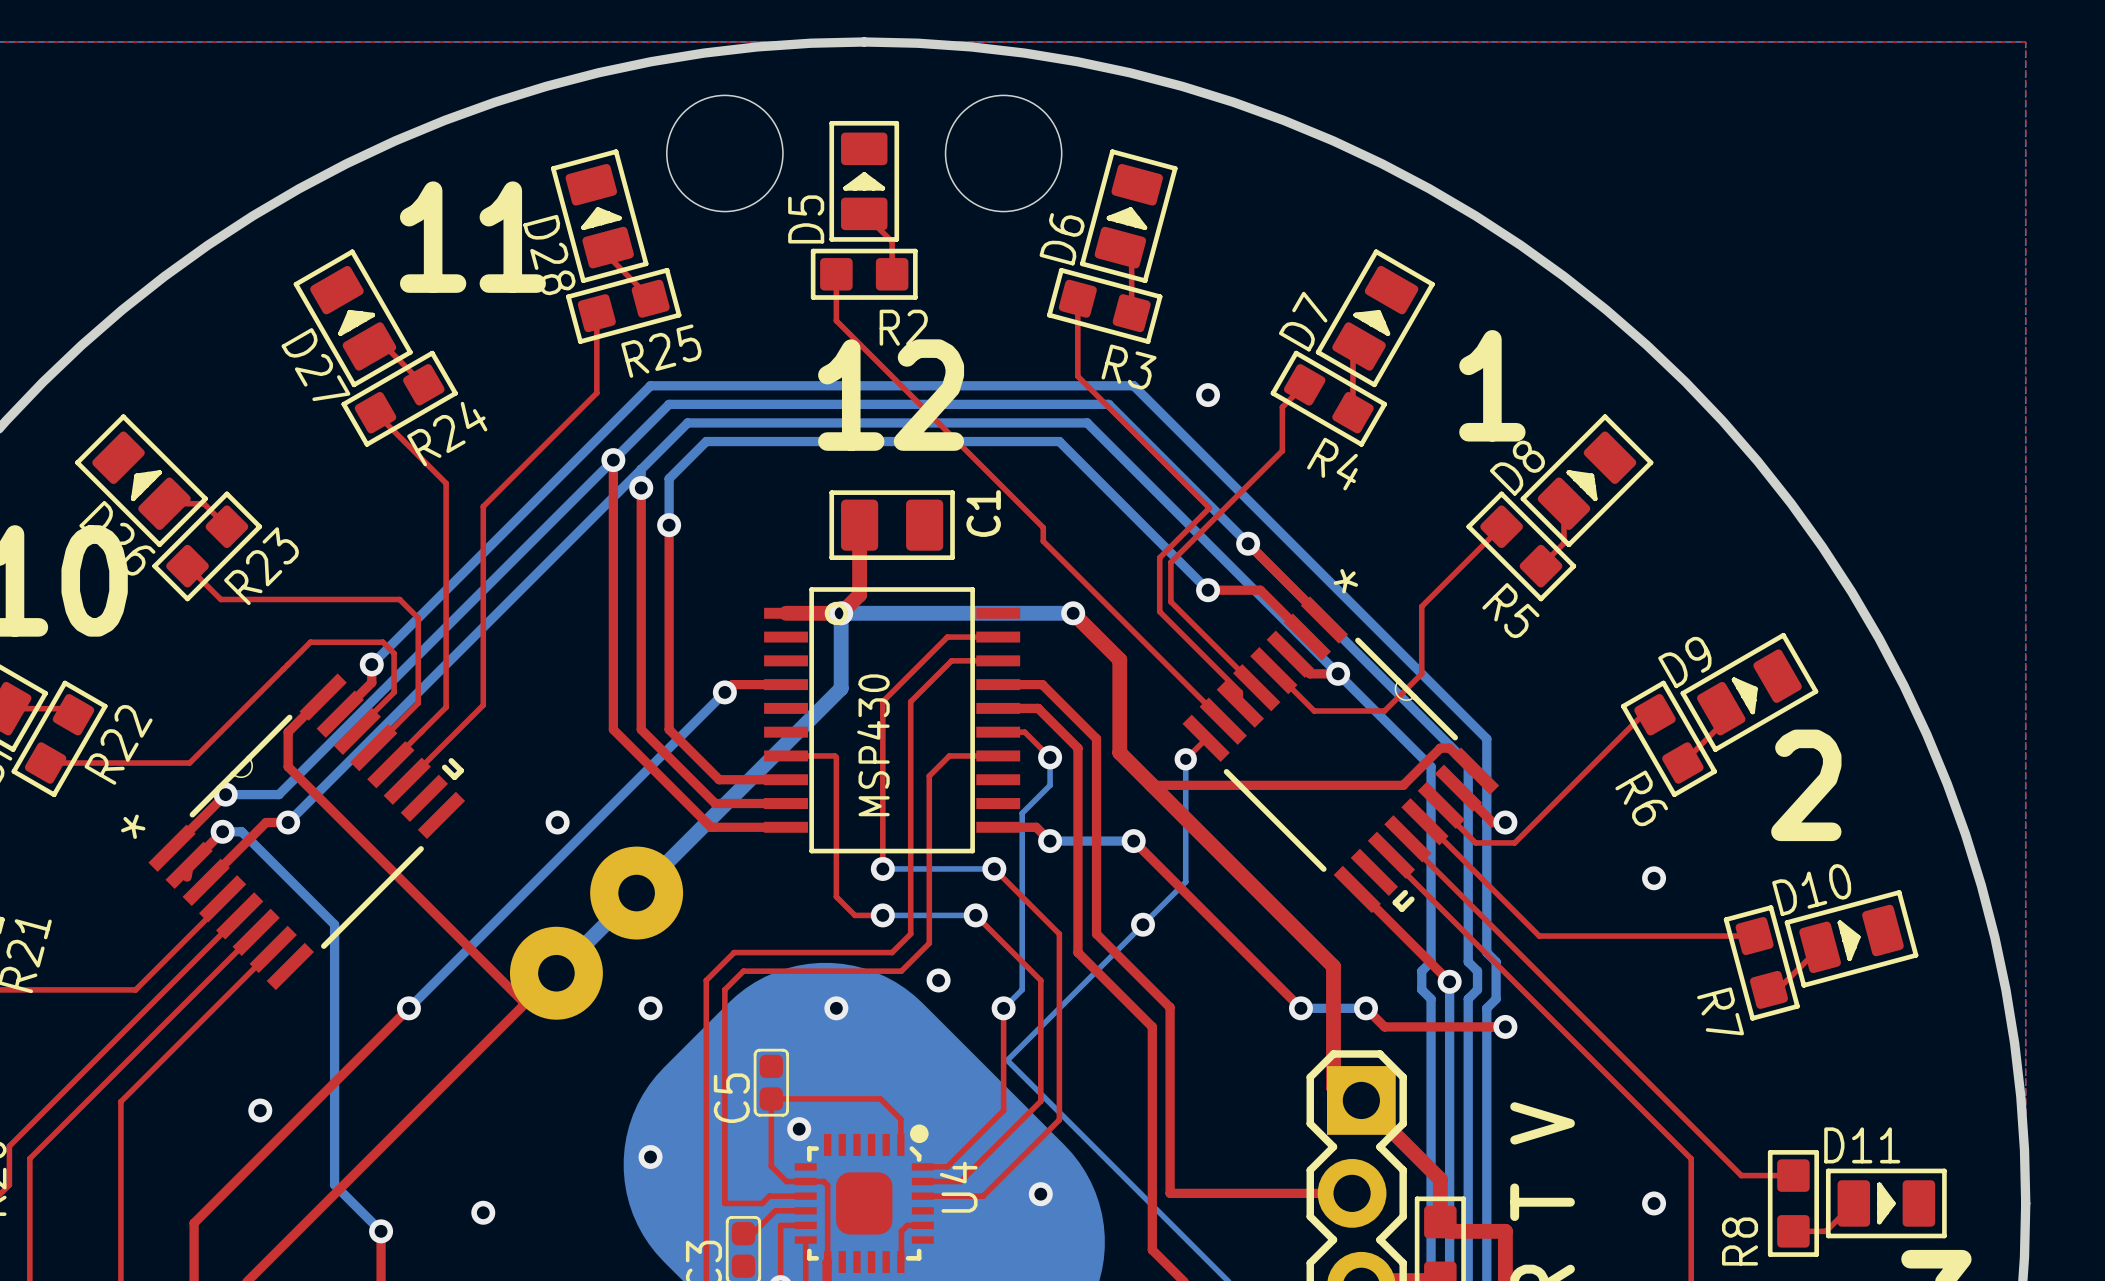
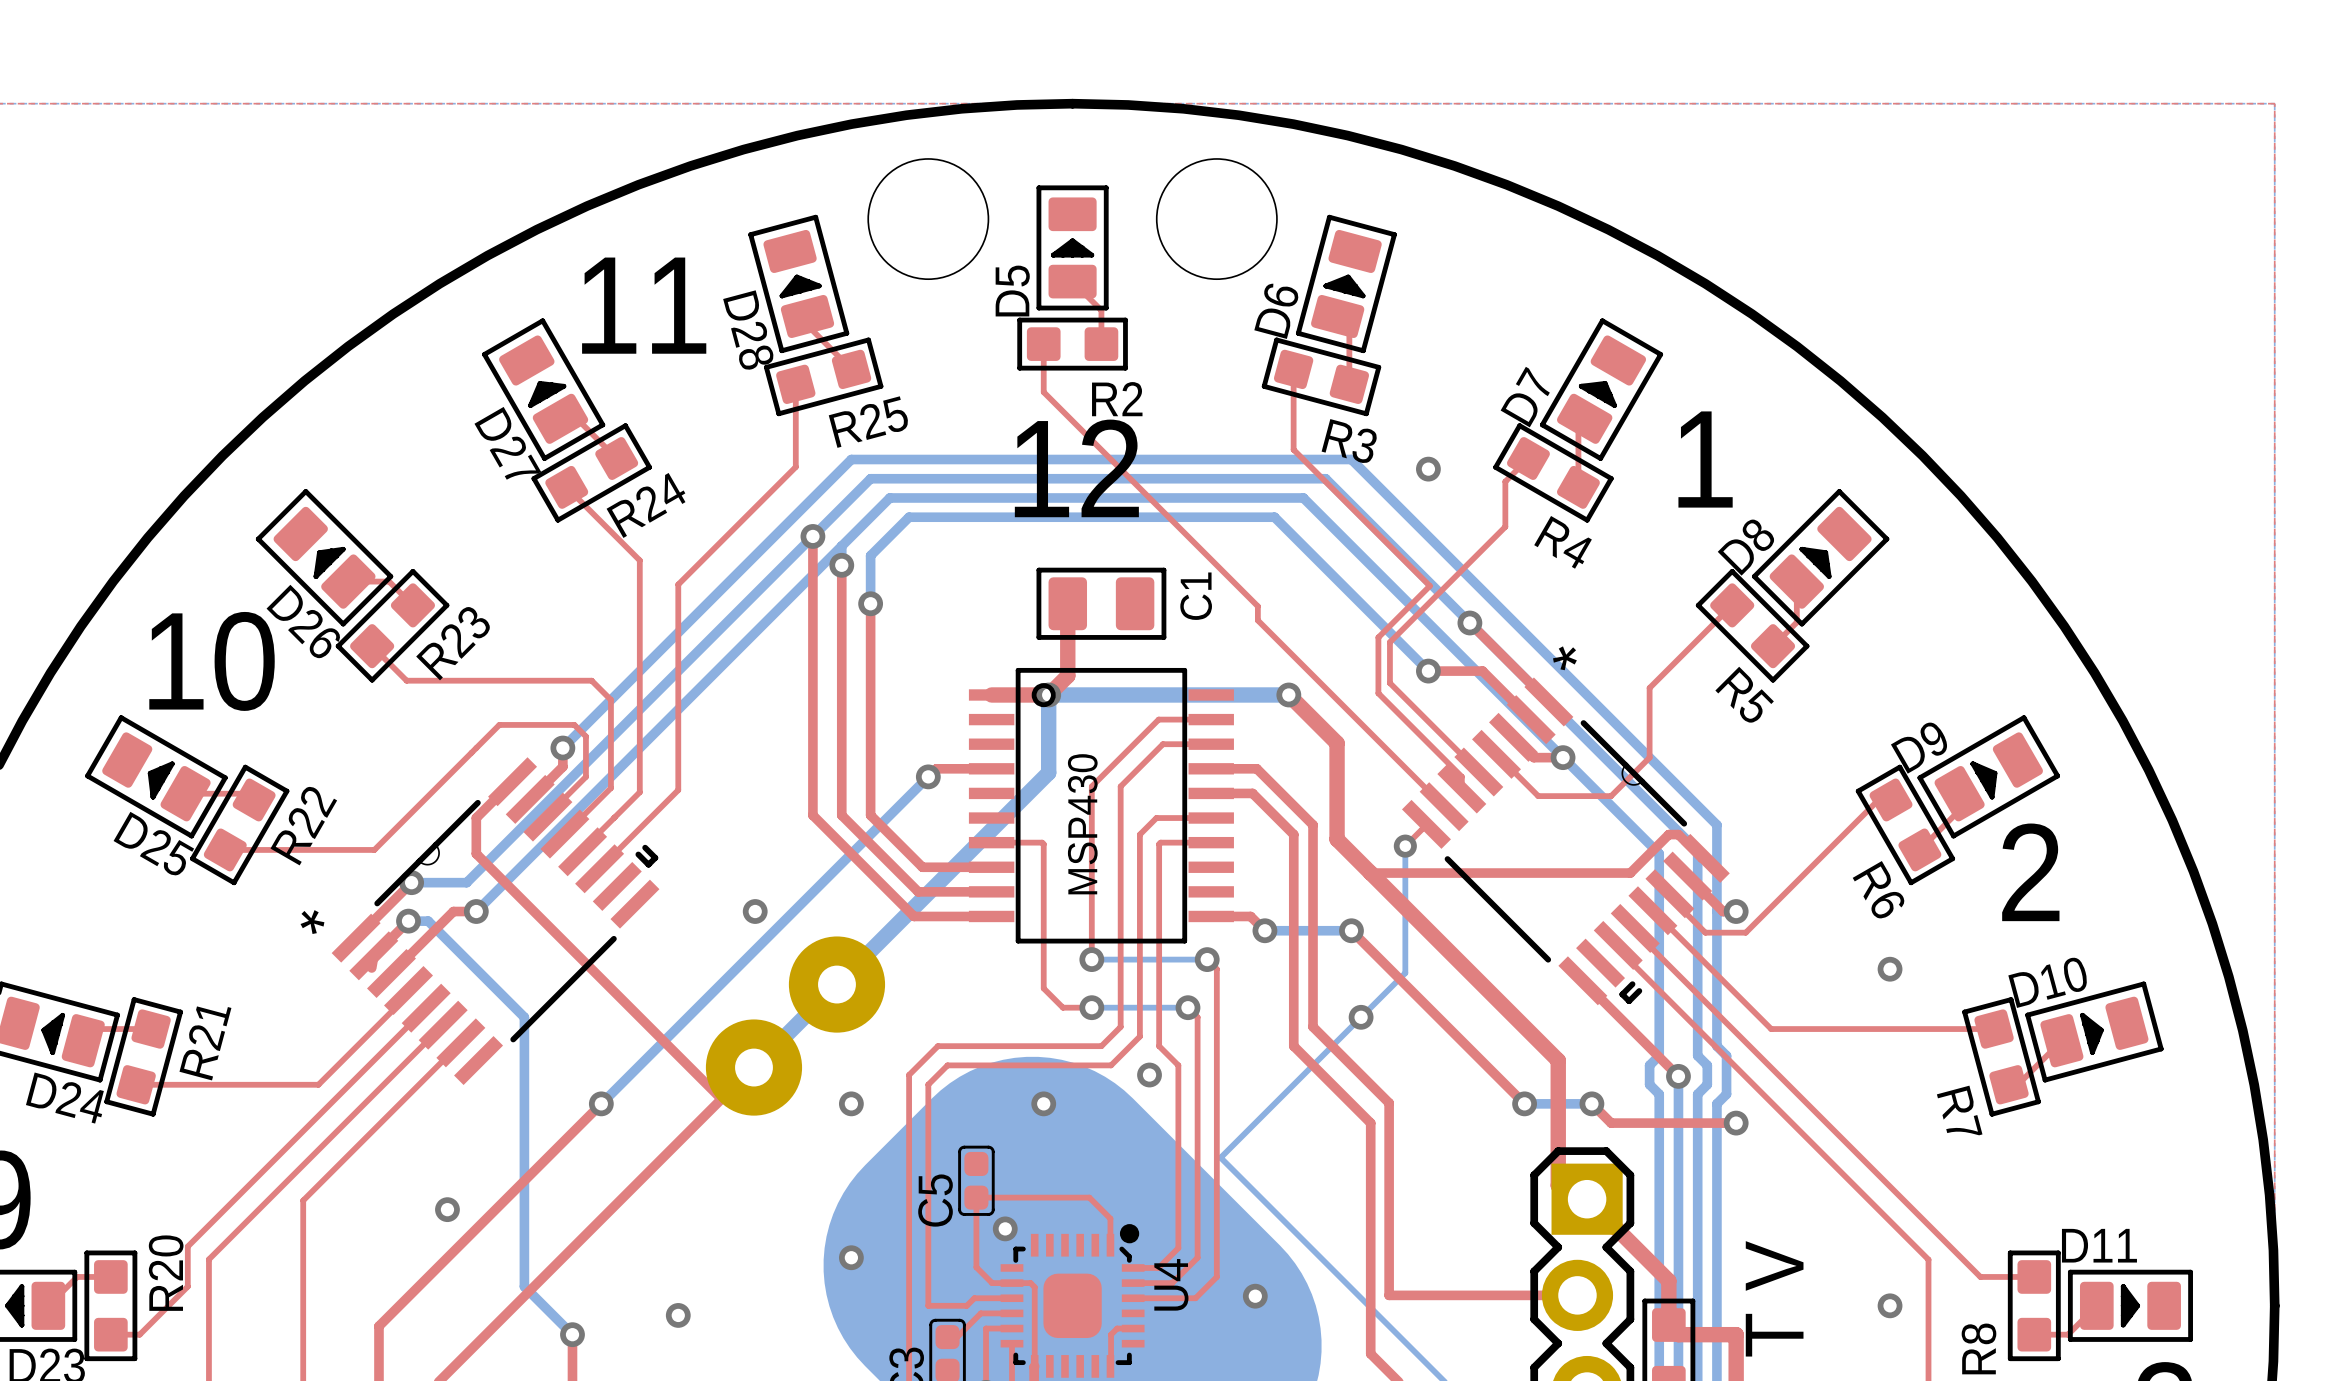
top track: (998, 732) (1024, 732) (1050, 757) -> none
top track: (947, 757) (929, 776) -> (1211, 818) (1156, 818) (1139, 834) (1139, 863)
top track: none -> (1159, 844) (1159, 1046) (1178, 1065) (1178, 1248)
bottom track: (1050, 757) (1050, 785) (1022, 813) (1022, 989) (1003, 1008) -> none
via: (1050, 757) -> none
top track: (1003, 878) (1059, 934) (1059, 1119) (1003, 1175) -> (1216, 969) (1216, 1103)
top track: (985, 924) (1040, 980) (1040, 1101) (985, 1157) -> (1197, 1017) (1197, 1257)
via: (1003, 1008) -> none
top track: (1003, 1110) (966, 1147) -> (1216, 1209) (1216, 1276)

